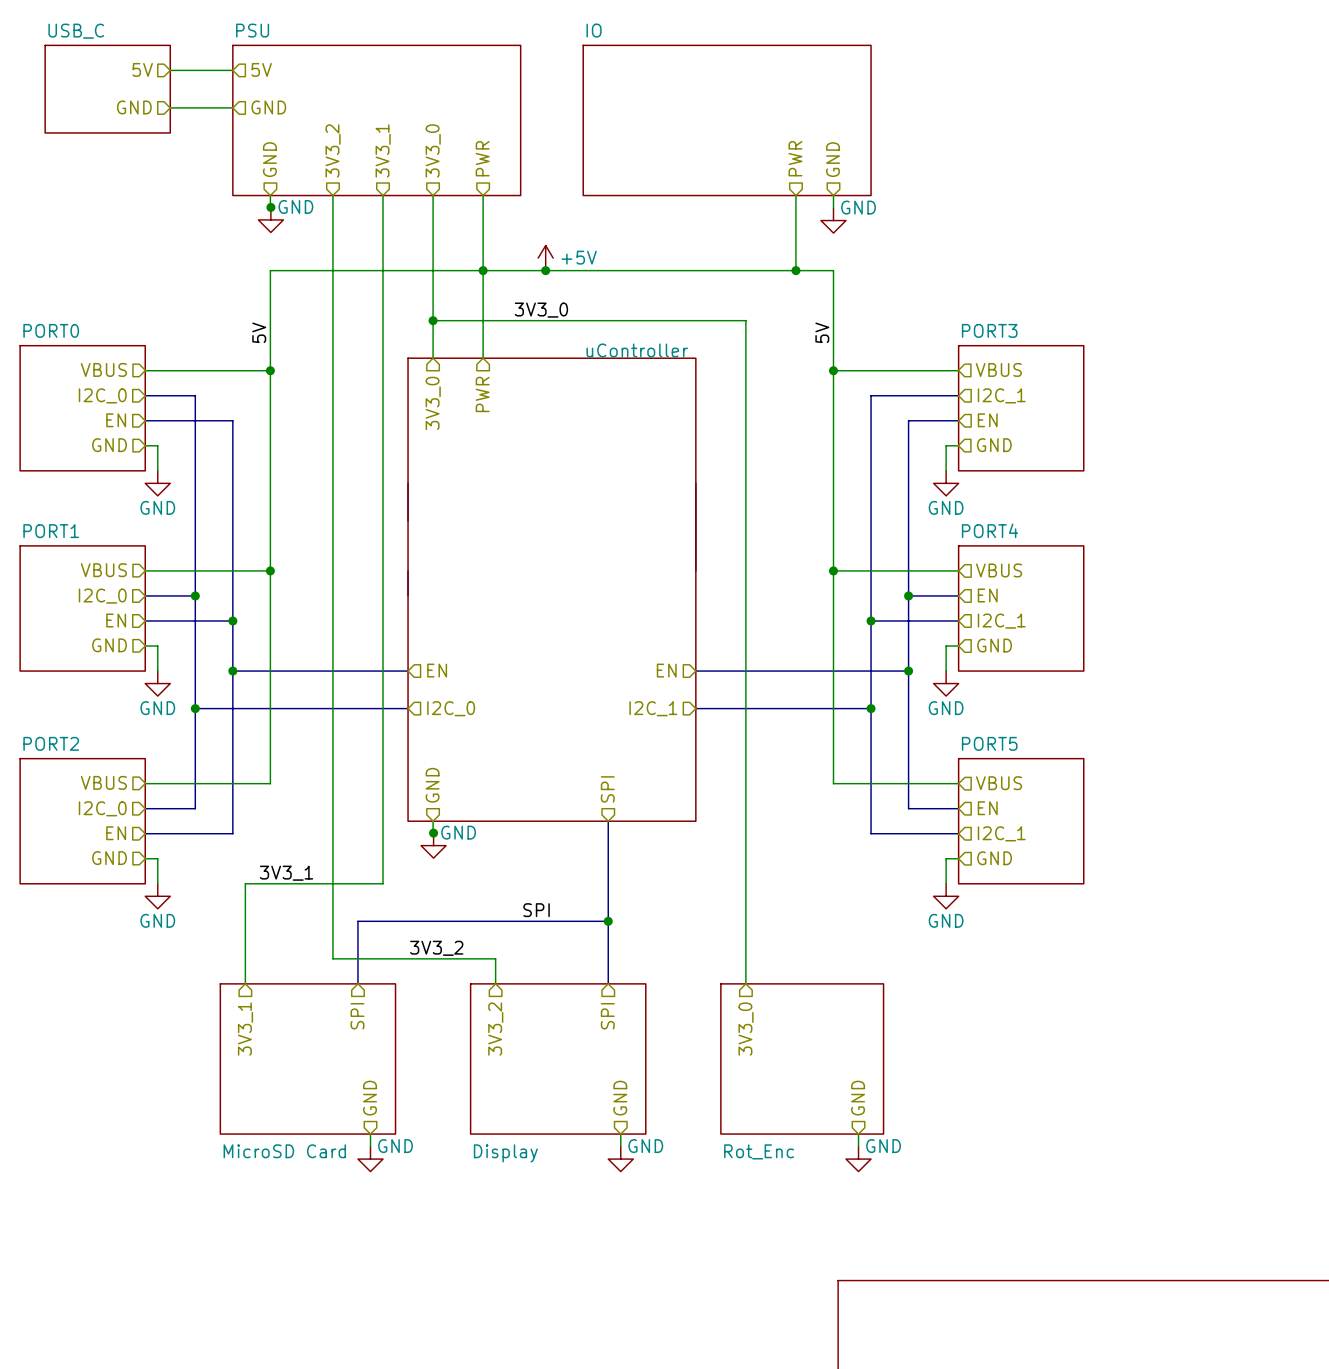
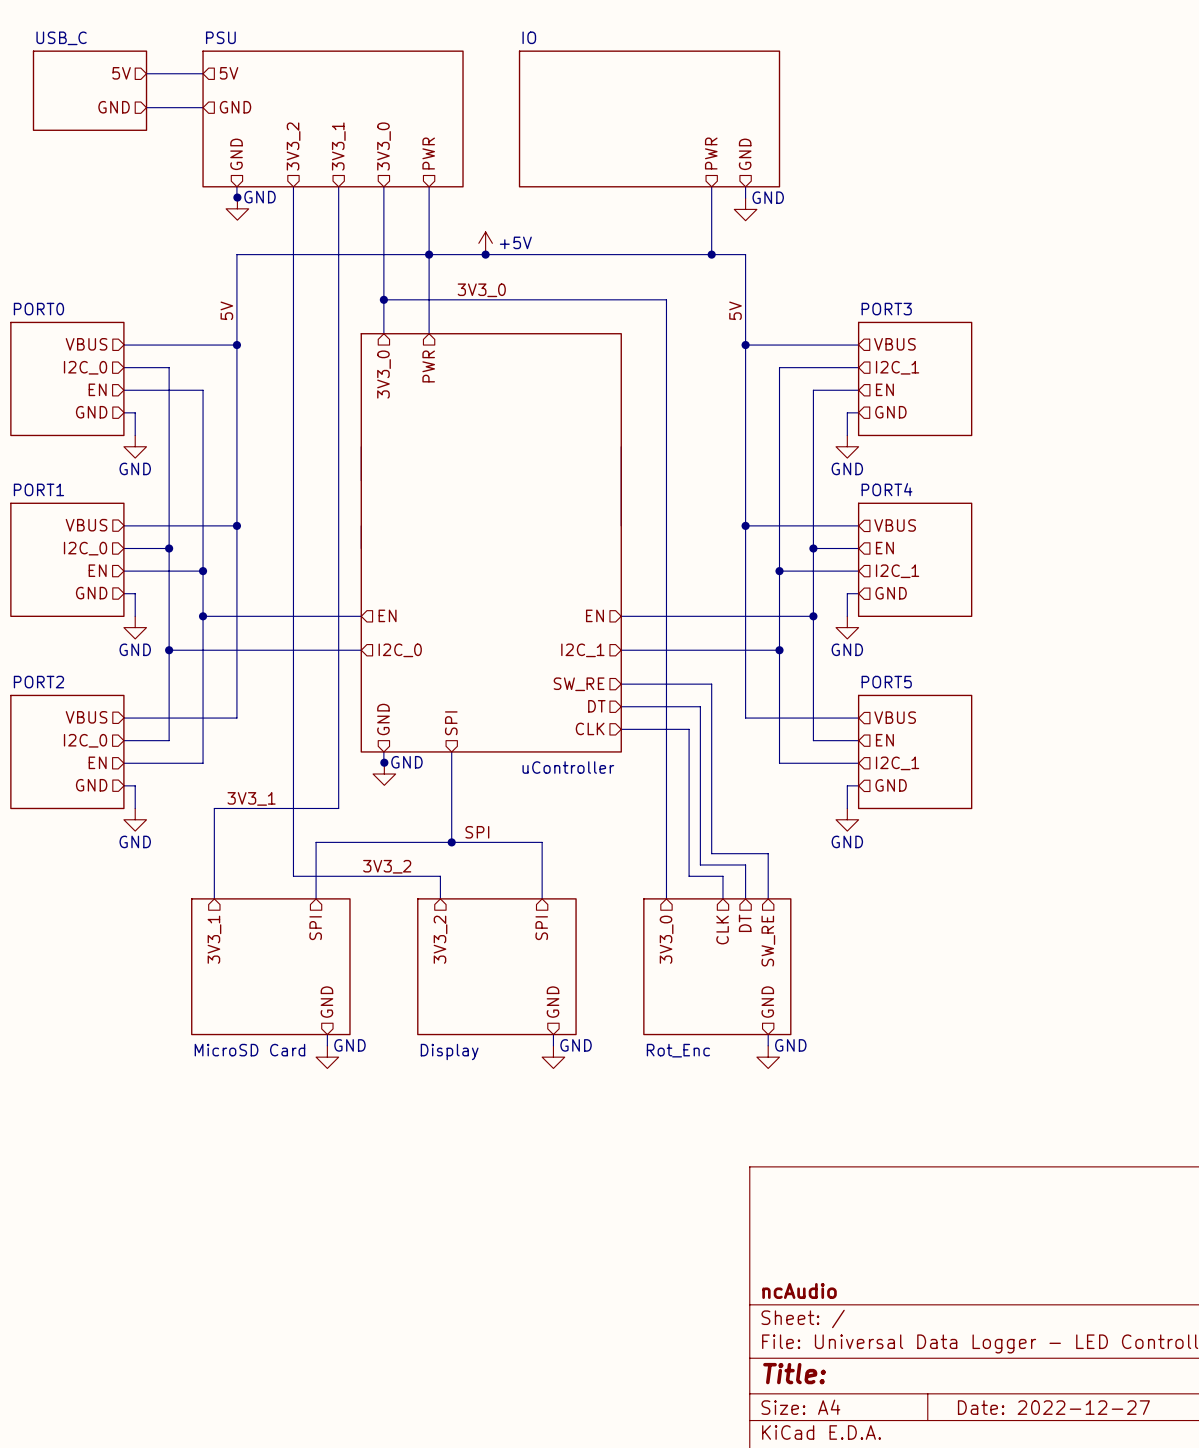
sheet uController name position: uController (637, 350) -> uController (568, 767)
hierarchical label: none -> SW_RE (579, 684)
wire: none -> (621, 684) (711, 684) (711, 853) (768, 853) (768, 898)
hierarchical label: none -> DT (596, 706)
wire: none -> (621, 706) (700, 706) (700, 864) (745, 864) (745, 898)
hierarchical label position: SPI (607, 789) -> SPI (451, 723)
hierarchical label: none -> CLK (590, 728)
wire: none -> (621, 729) (689, 729) (689, 876) (722, 876) (722, 898)
bus: (608, 821) (608, 921) -> (451, 751) (451, 842)
junction: none -> (451, 842)
junction: (608, 921) -> none
hierarchical label: none -> DT (745, 923)
hierarchical label: none -> CLK (722, 930)
hierarchical label: none -> SW_RE (768, 941)

